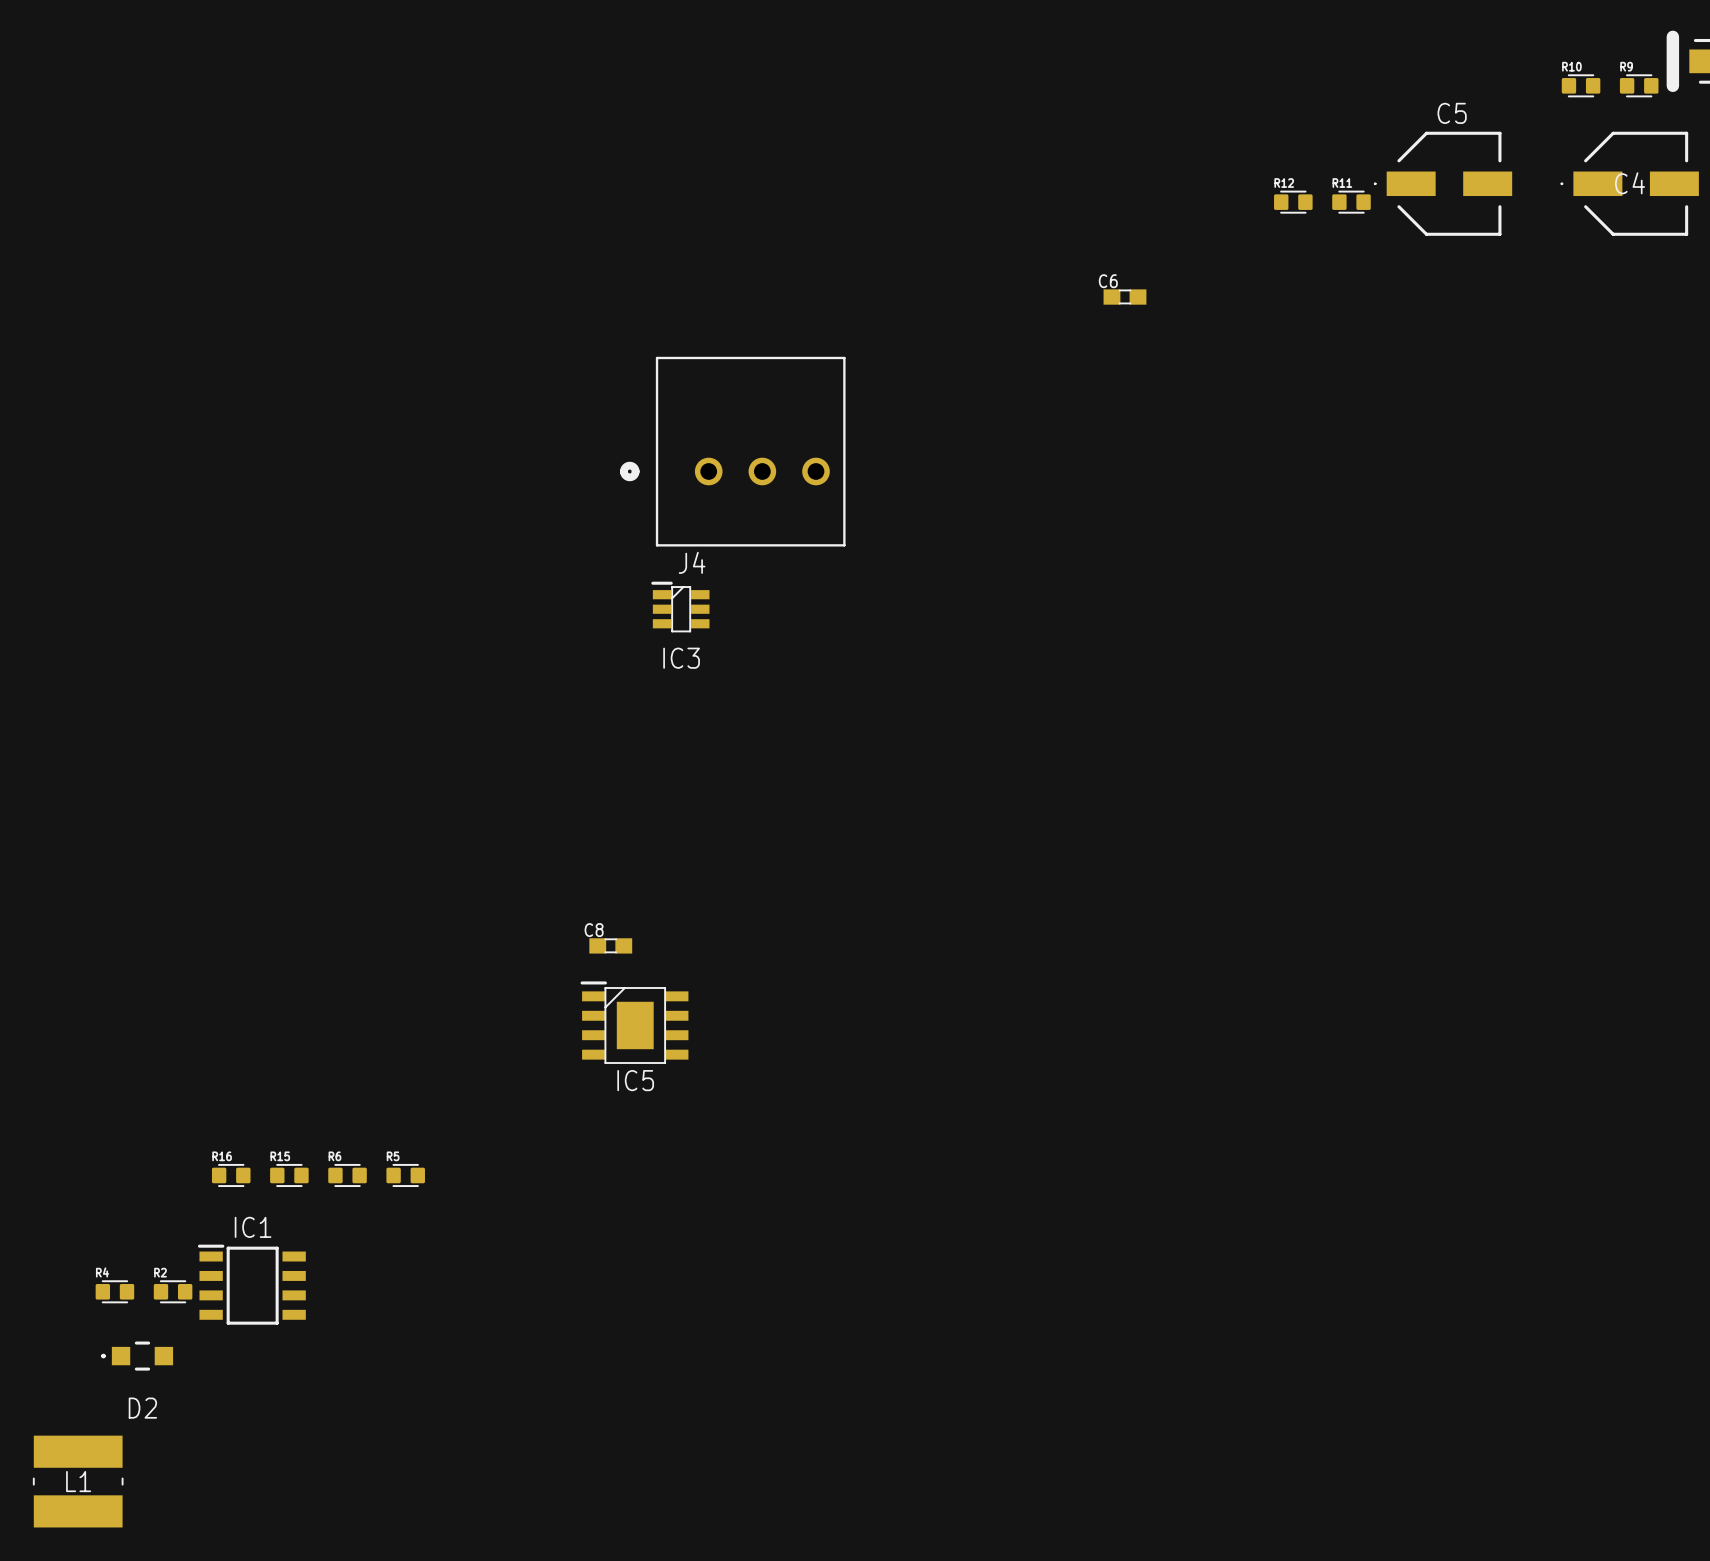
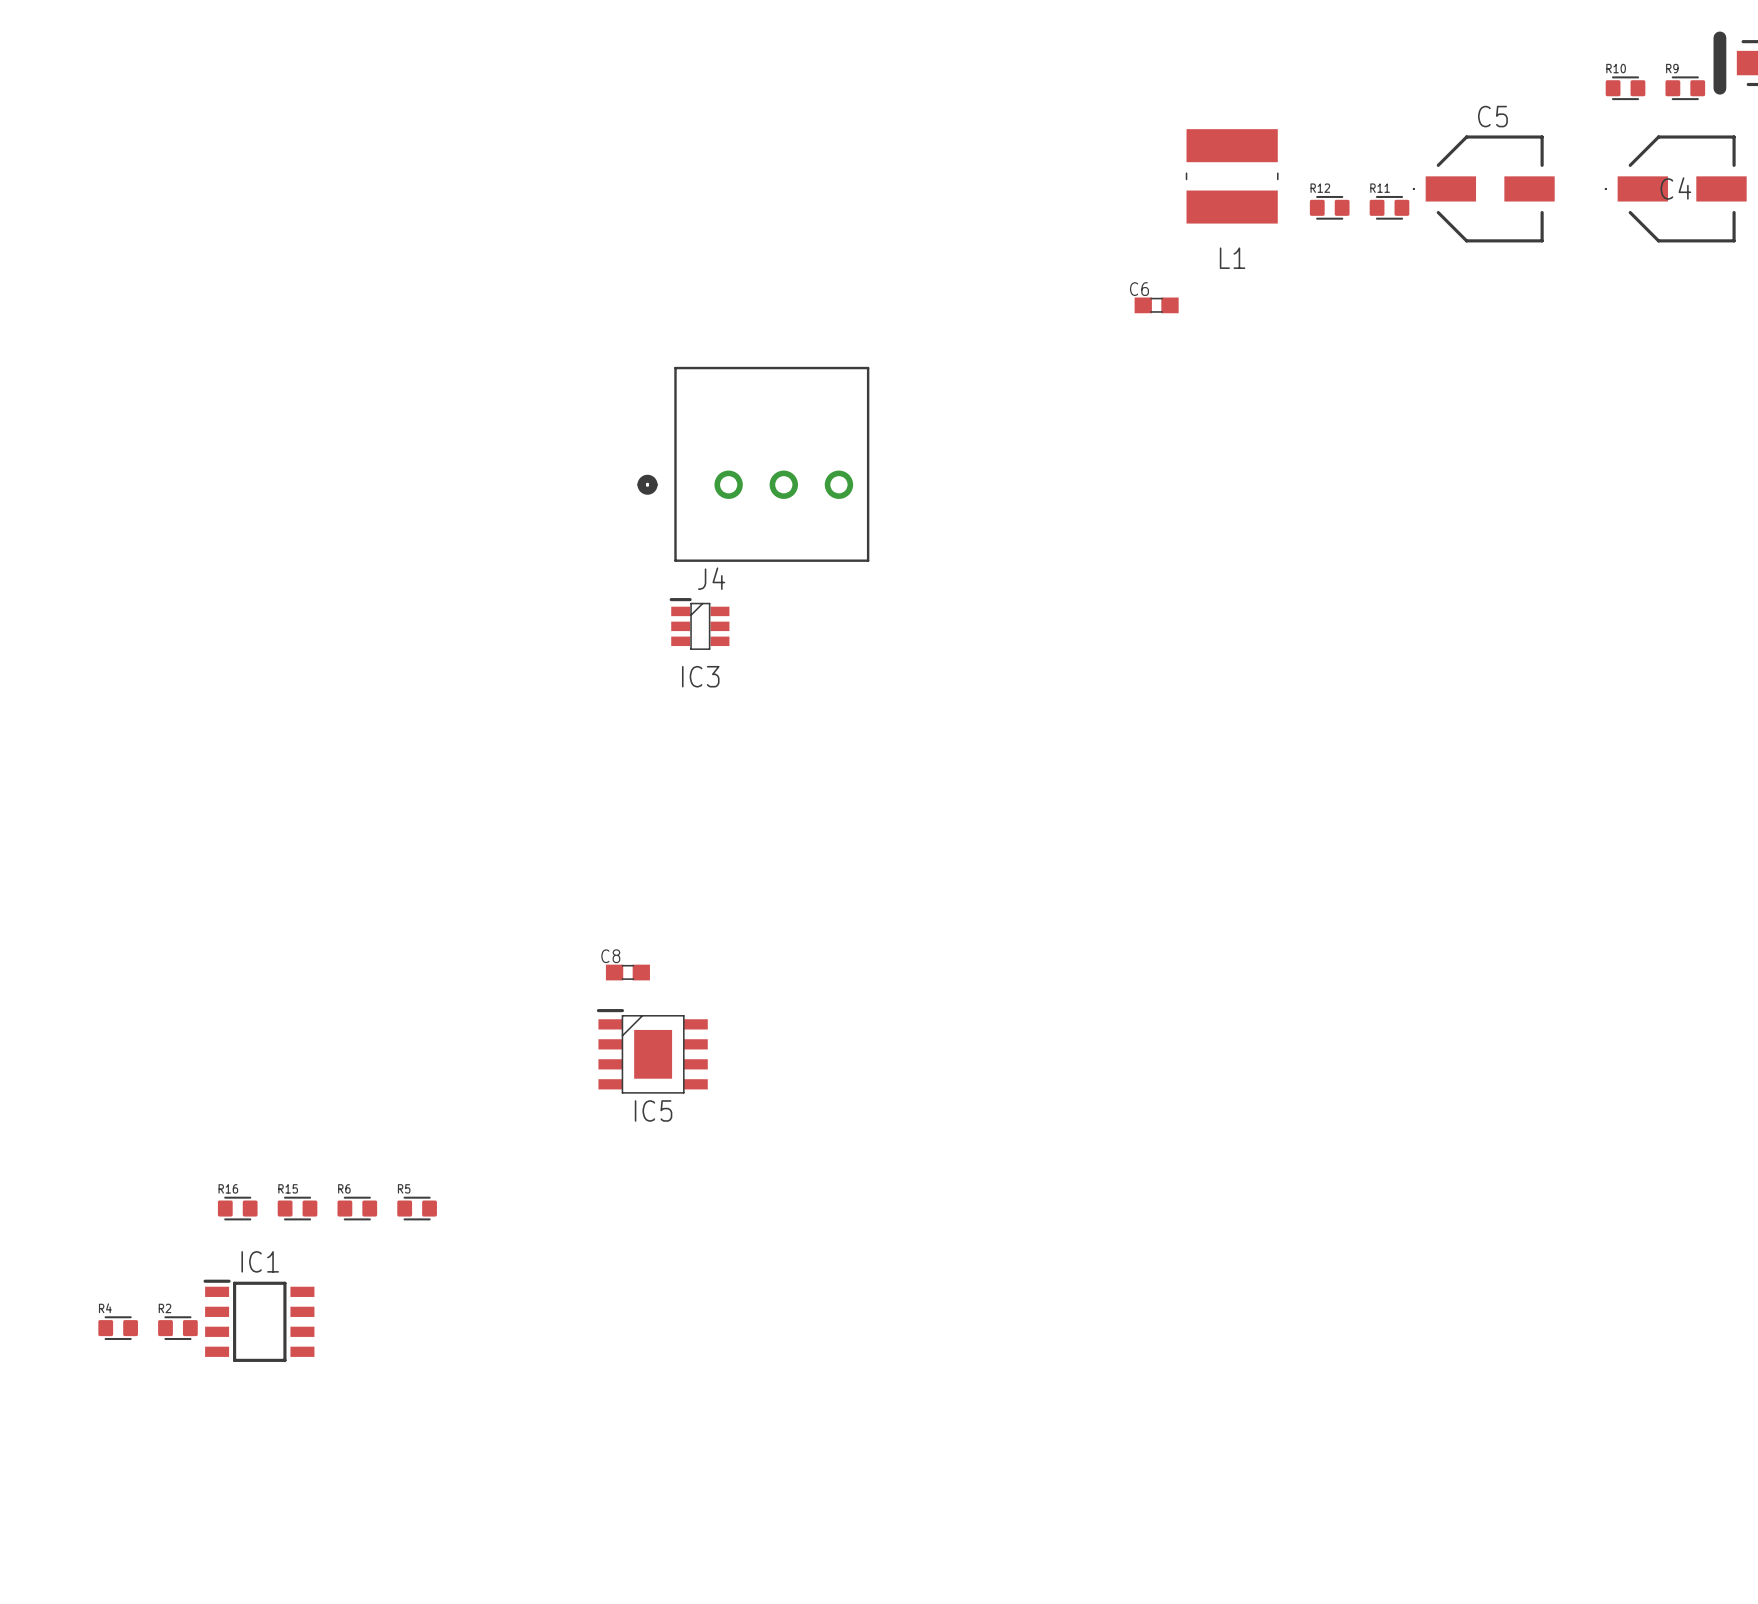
D2: (137, 1356) -> none
L1 position: (78, 1481) -> (1232, 176)
L1 name position: L1 (78, 1481) -> L1 (1232, 258)

